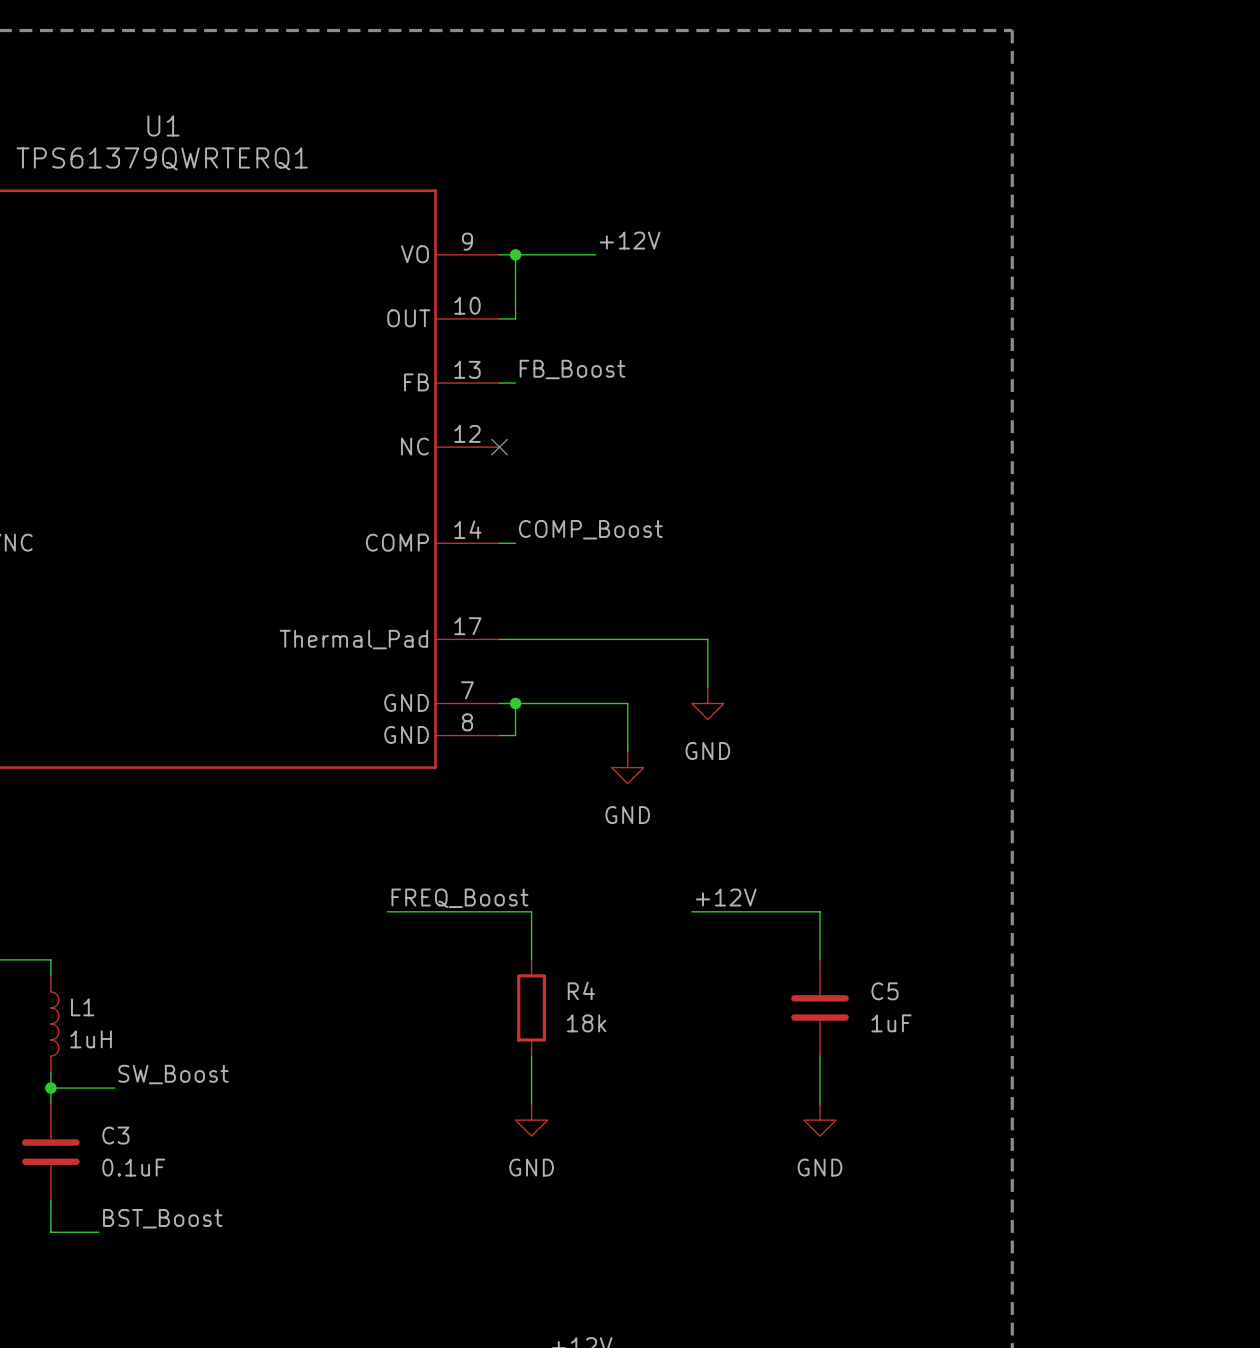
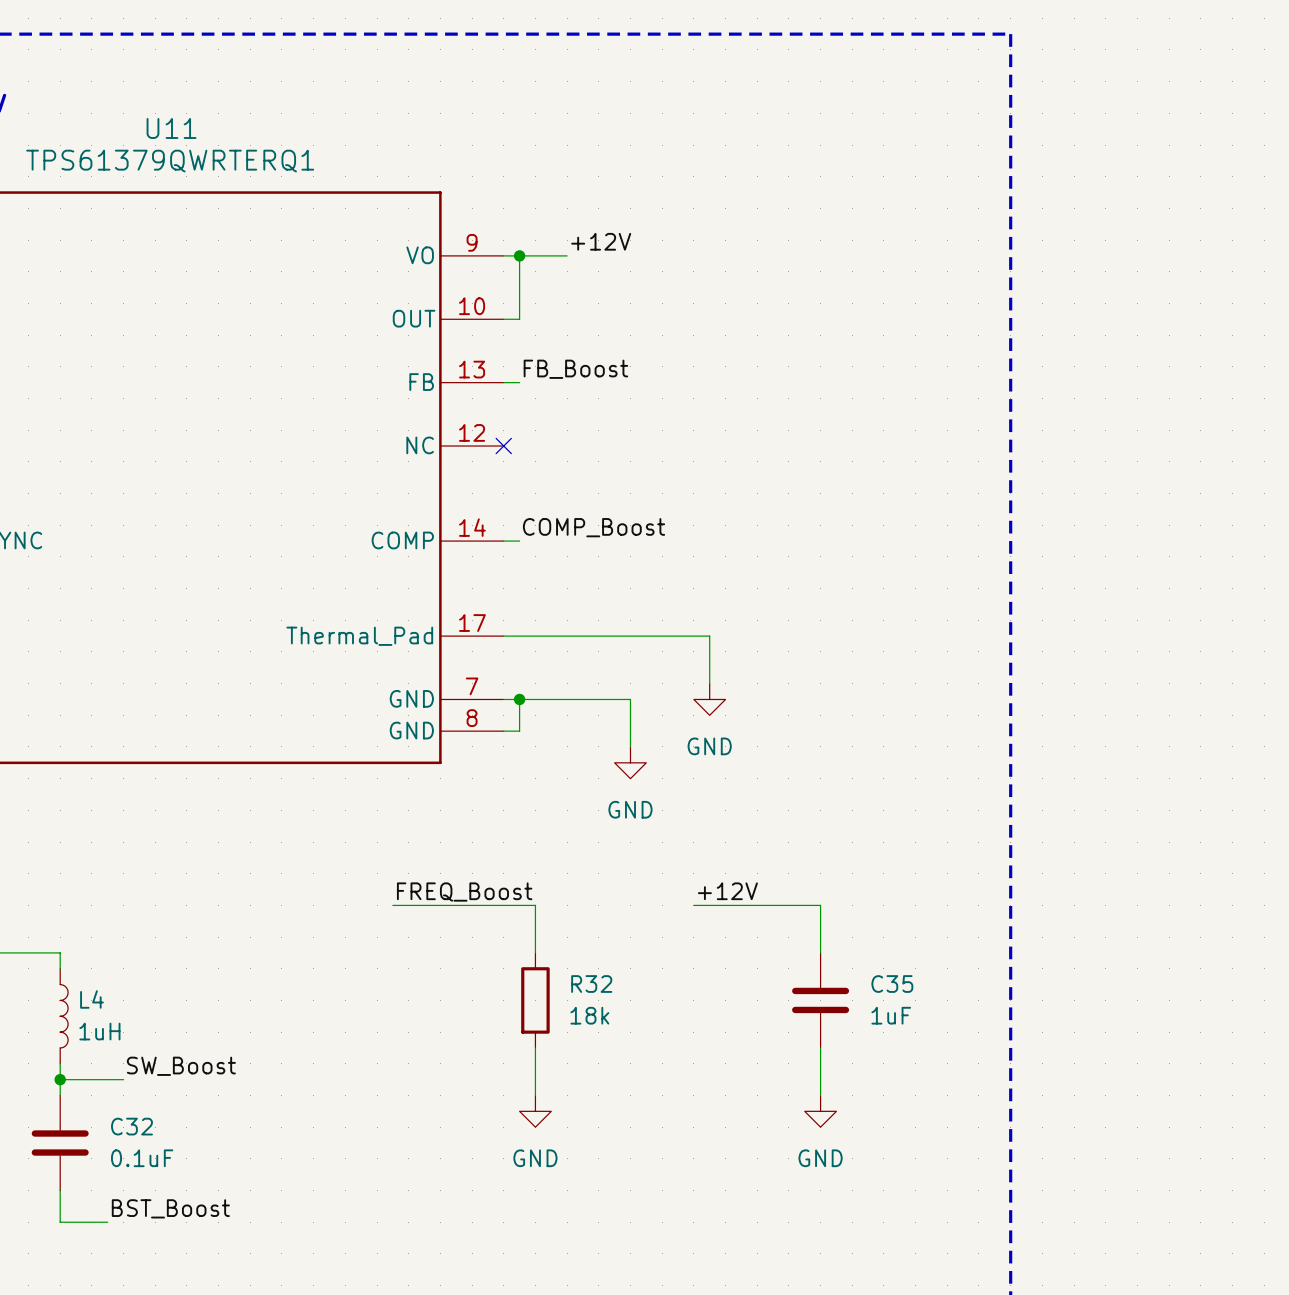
U1 name: U1 (163, 125) -> U11 (171, 128)
label position: +12V (630, 240) -> +12V (601, 241)
wire: (563, 254) (595, 254) -> none
R4 name: R4 (581, 990) -> R32 (591, 984)
C5 name: C5 (884, 991) -> C35 (892, 984)
L1 name: L1 (82, 1007) -> L4 (92, 999)
C3 name: C3 (115, 1135) -> C32 (131, 1126)

